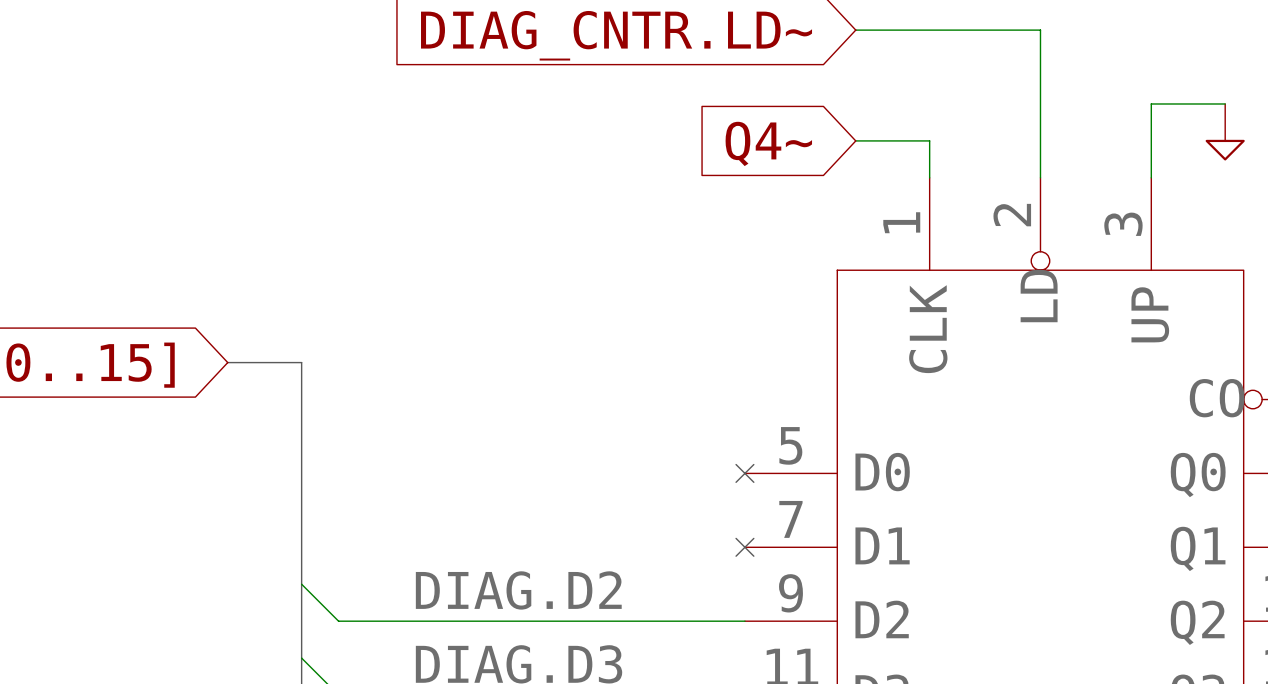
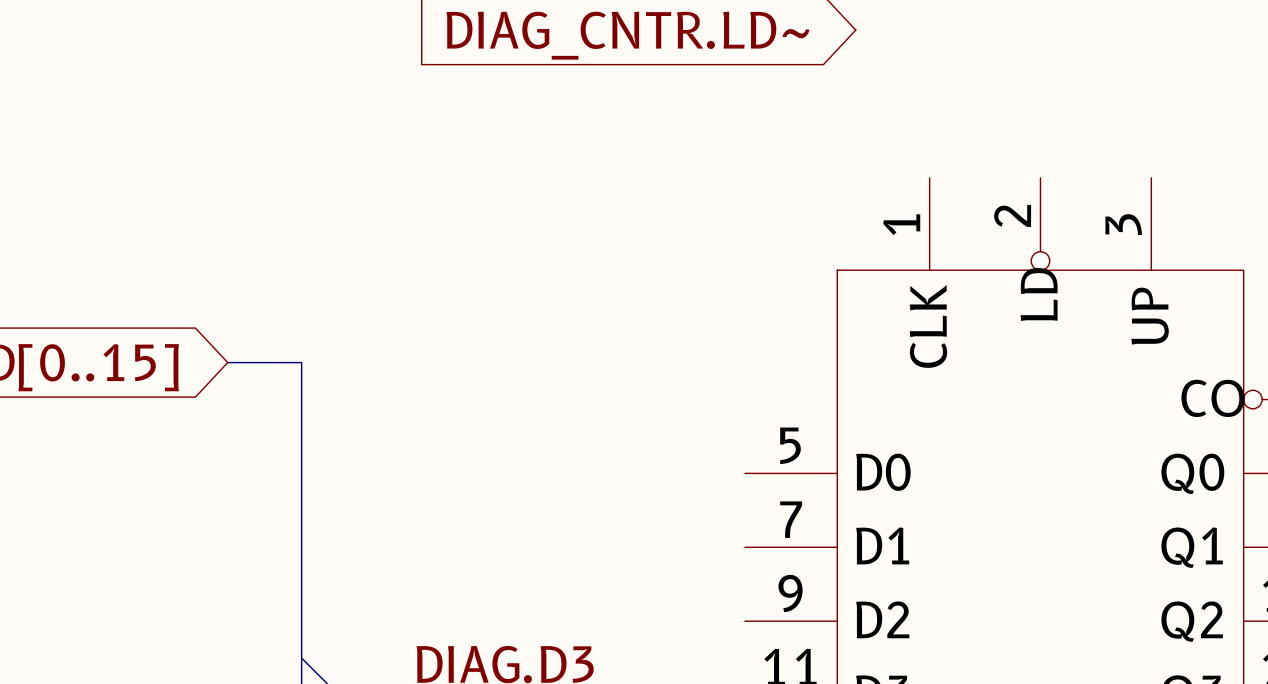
wire: (855, 30) (1040, 30) (1040, 177) -> none
wire: (1225, 103) (1151, 103) (1151, 177) -> none
power symbol: (1225, 132) -> none
wire: (855, 140) (929, 140) (929, 177) -> none
global label: Q4~ (768, 143) -> none
no-connect mark: (744, 473) -> none
no-connect mark: (744, 547) -> none
wire: (301, 584) (338, 621) (744, 621) -> none
label: DIAG.D2 (518, 590) -> none

